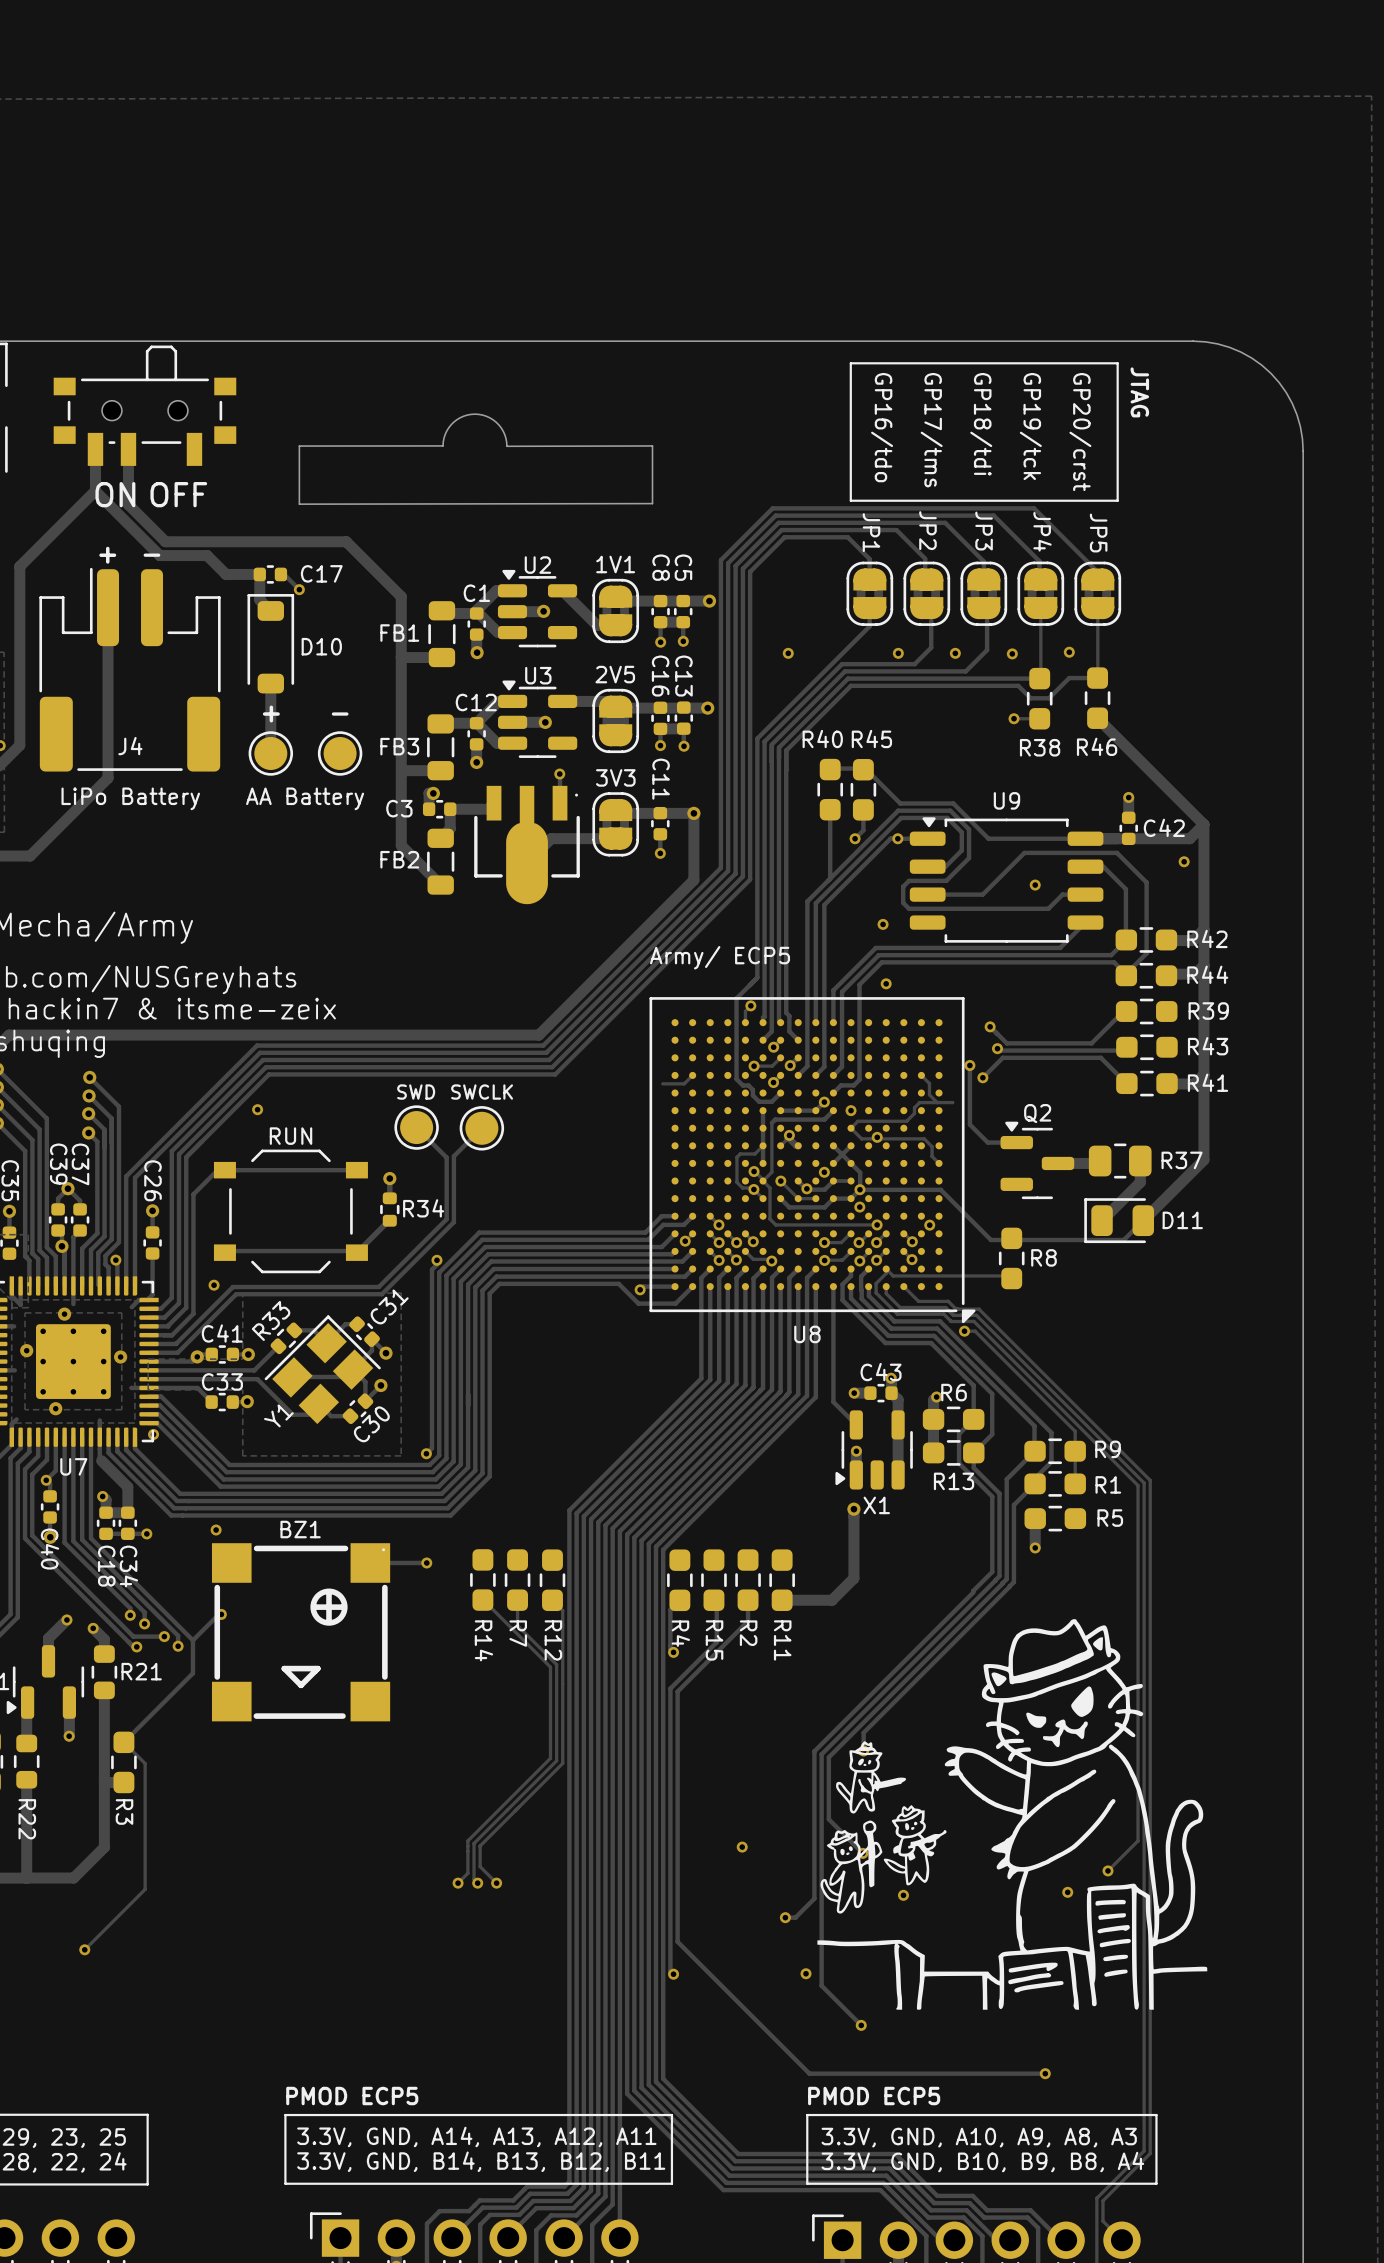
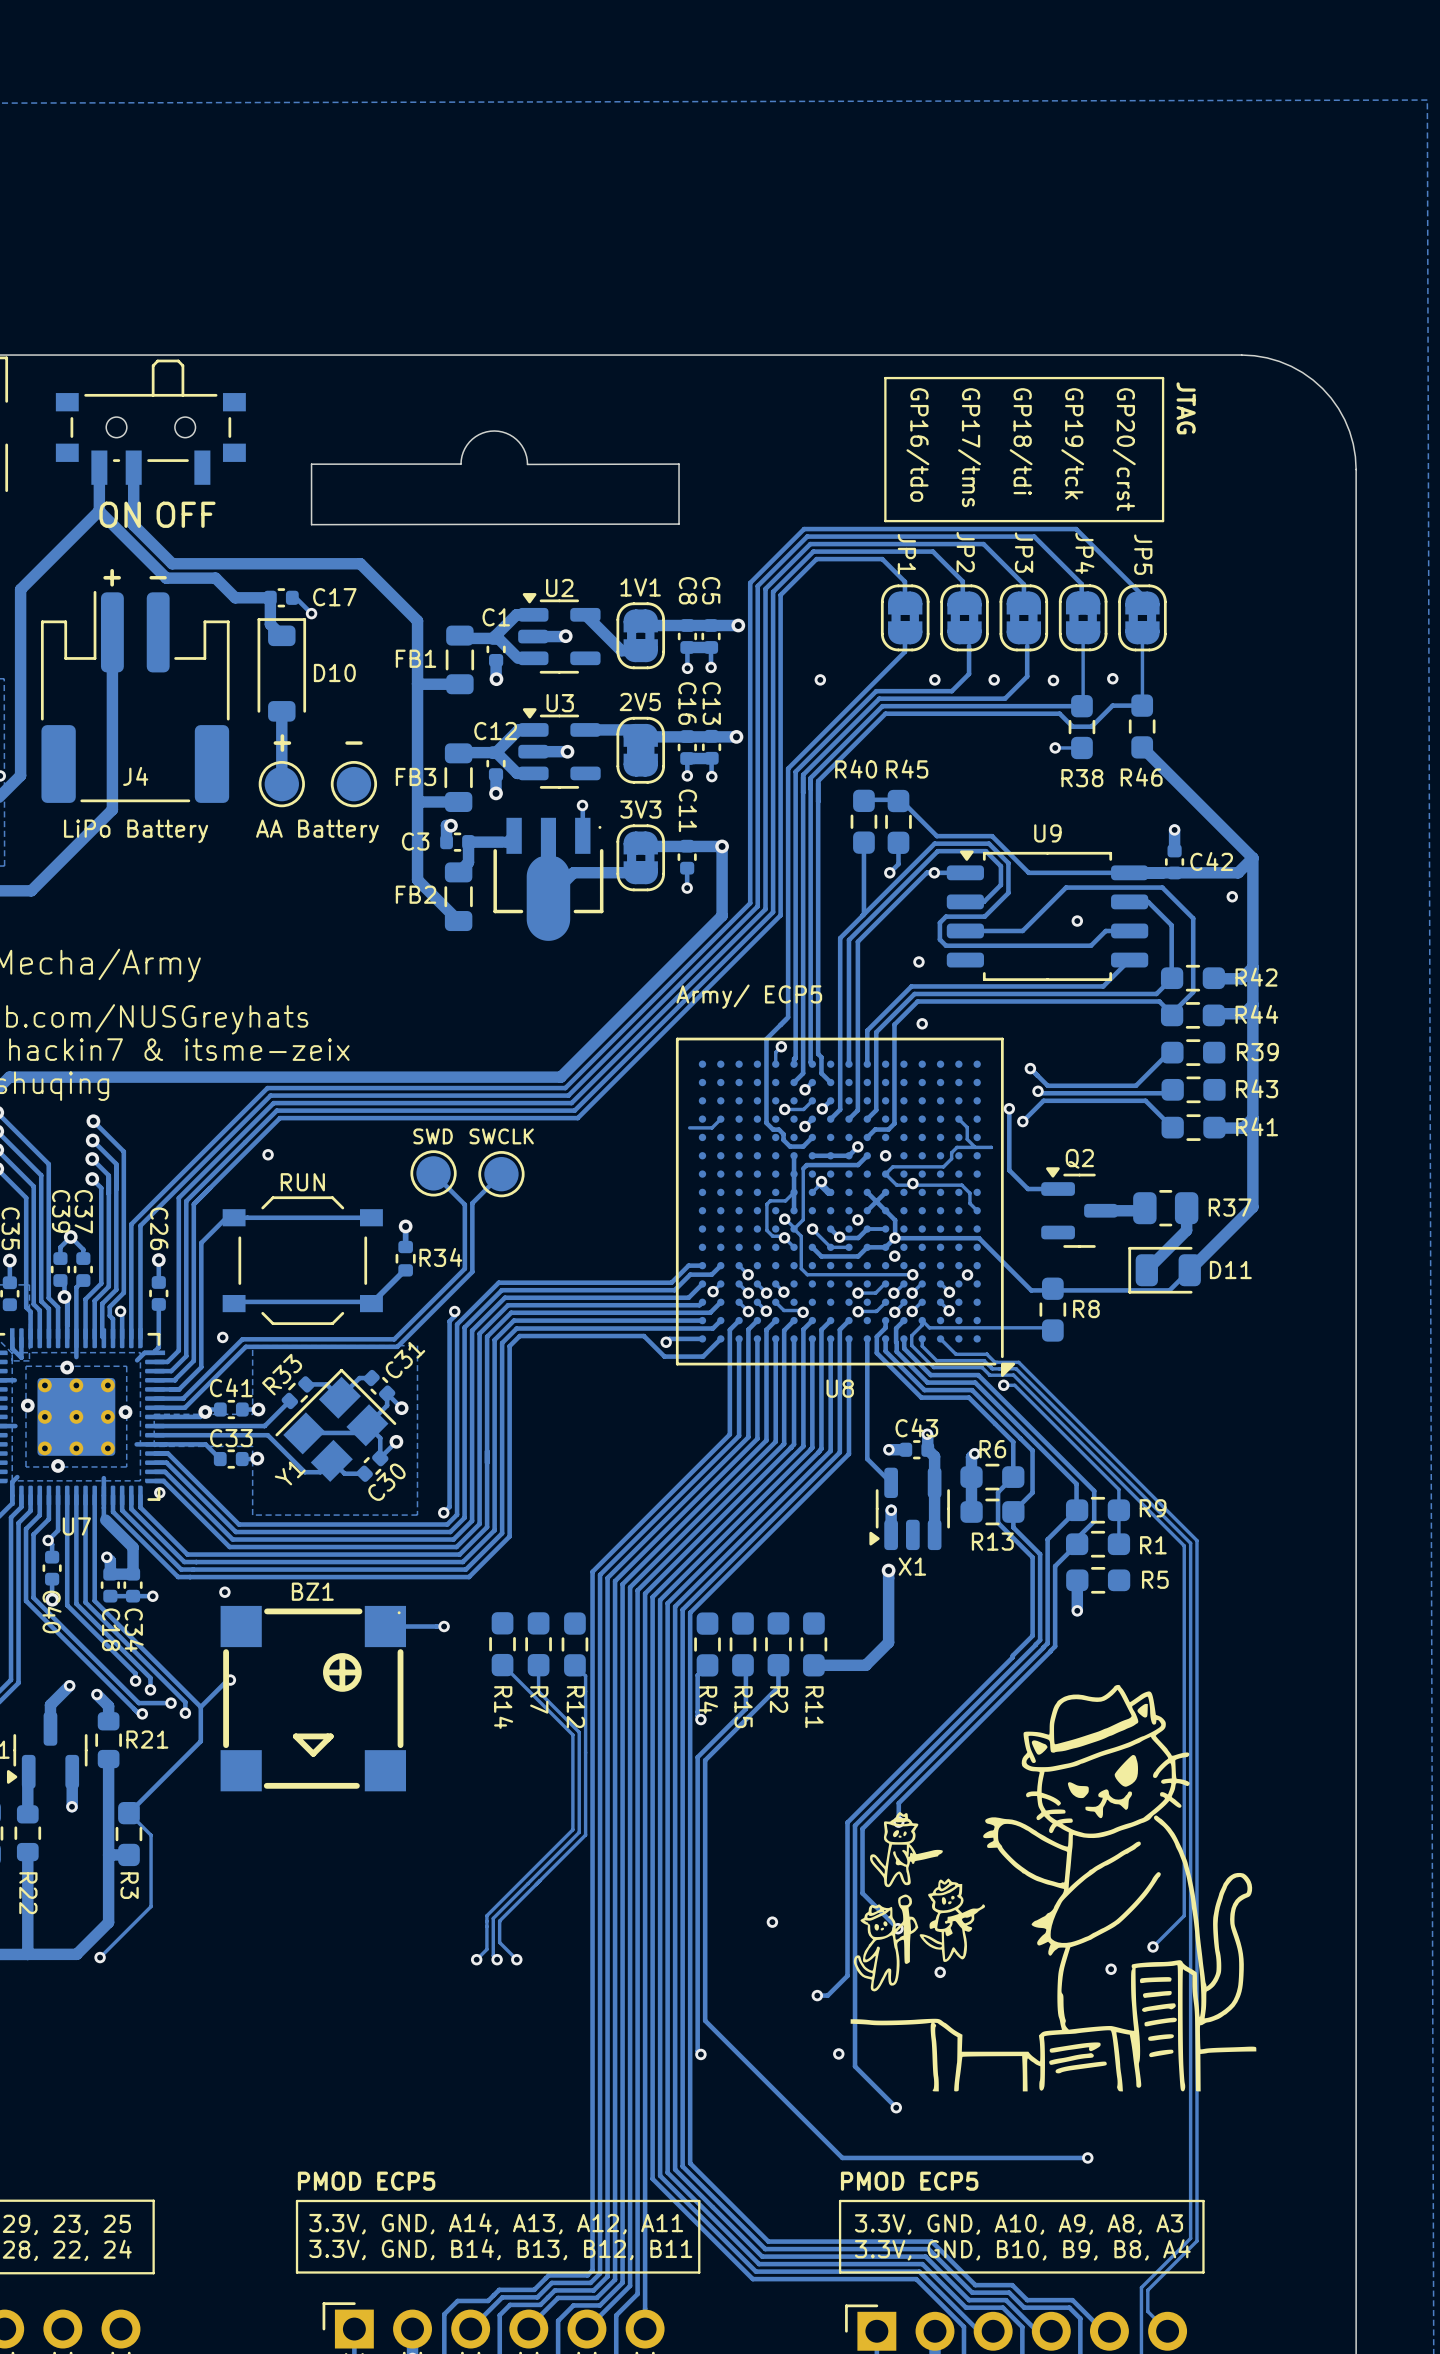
track: (145, 1832) (145, 1889) (84, 1949) -> (151, 1906) (100, 1957)
via position: (84, 1949) -> (100, 1957)

